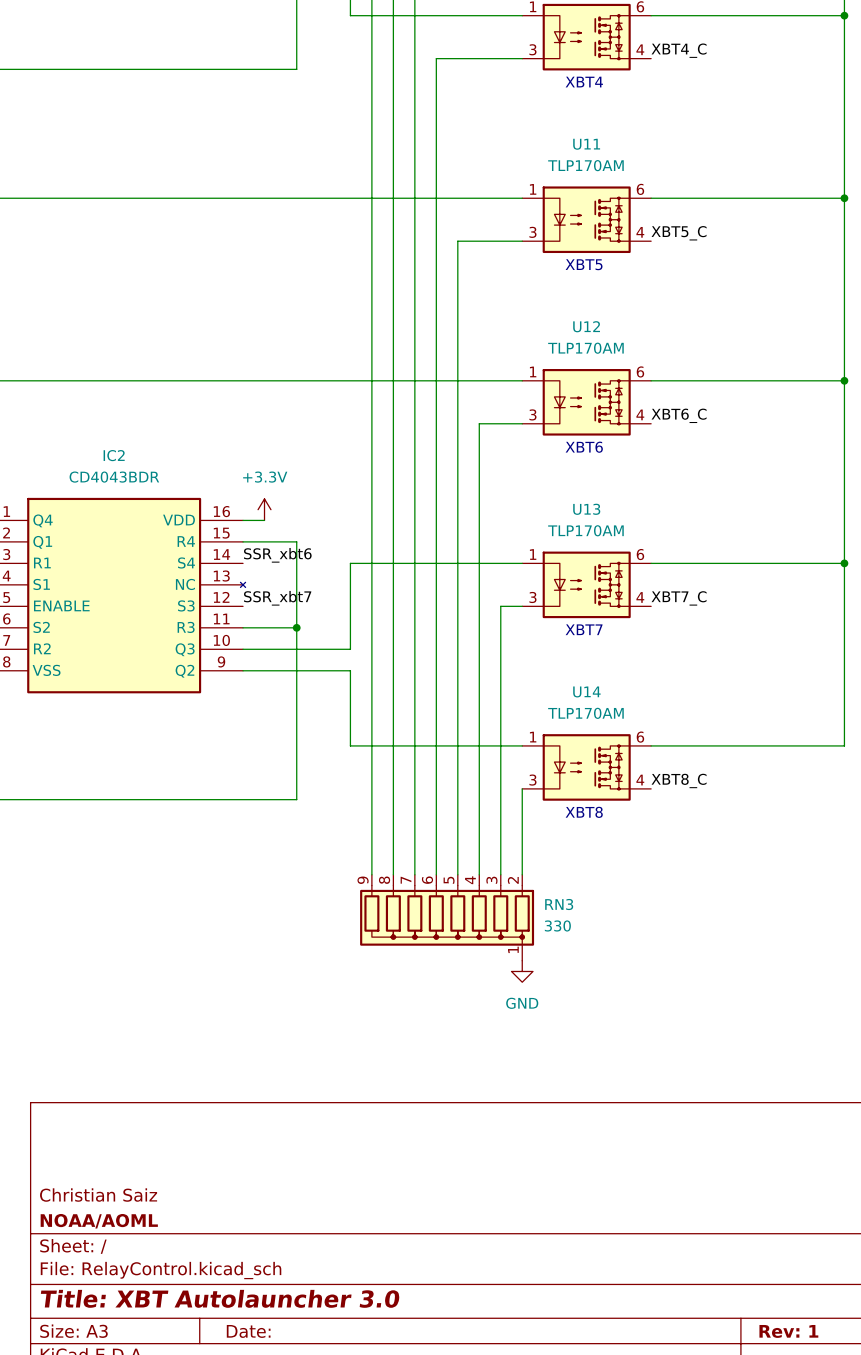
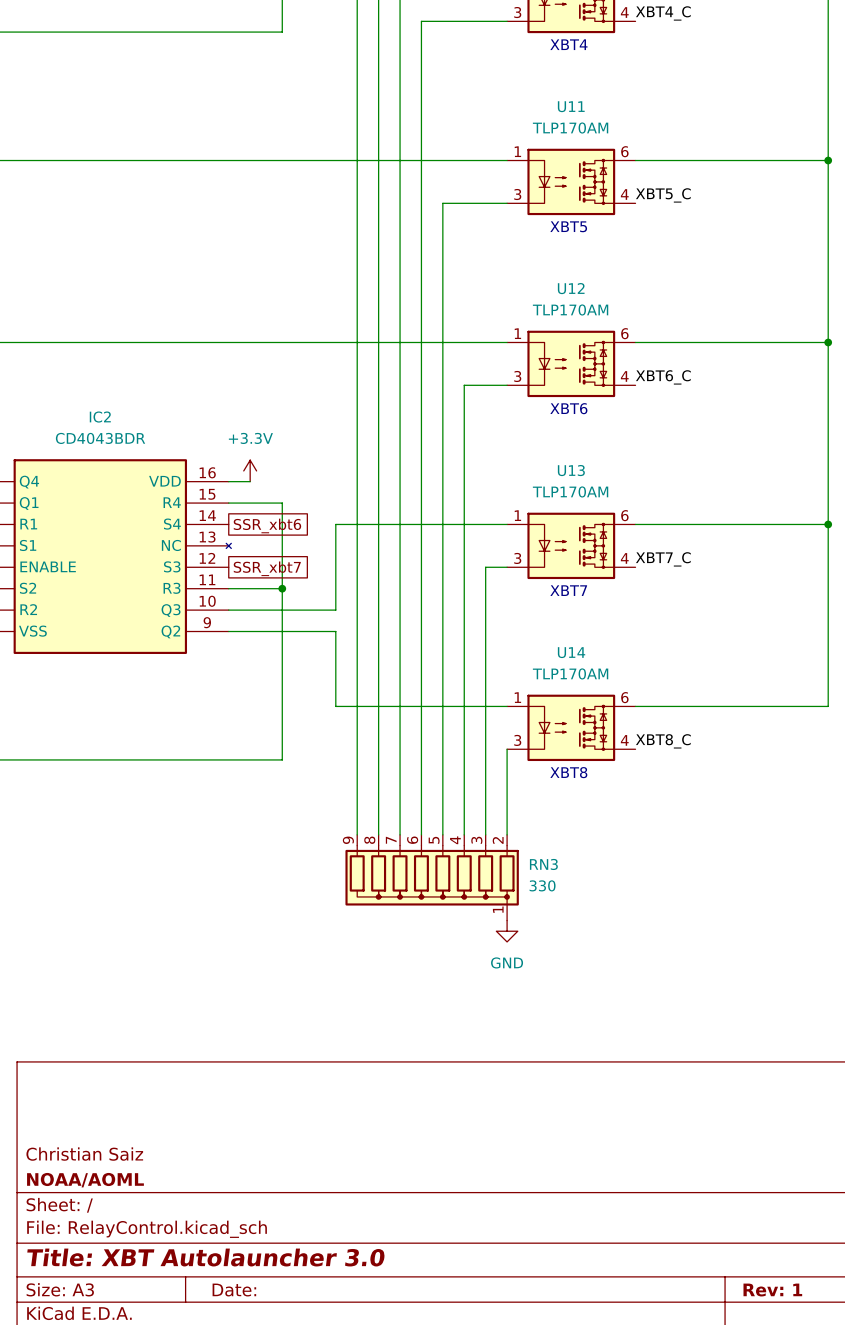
label: SSR_xbt6 (277, 555) -> none
global label: none -> SSR_xbt6 (267, 525)
label: SSR_xbt7 (277, 598) -> none
global label: none -> SSR_xbt7 (267, 568)

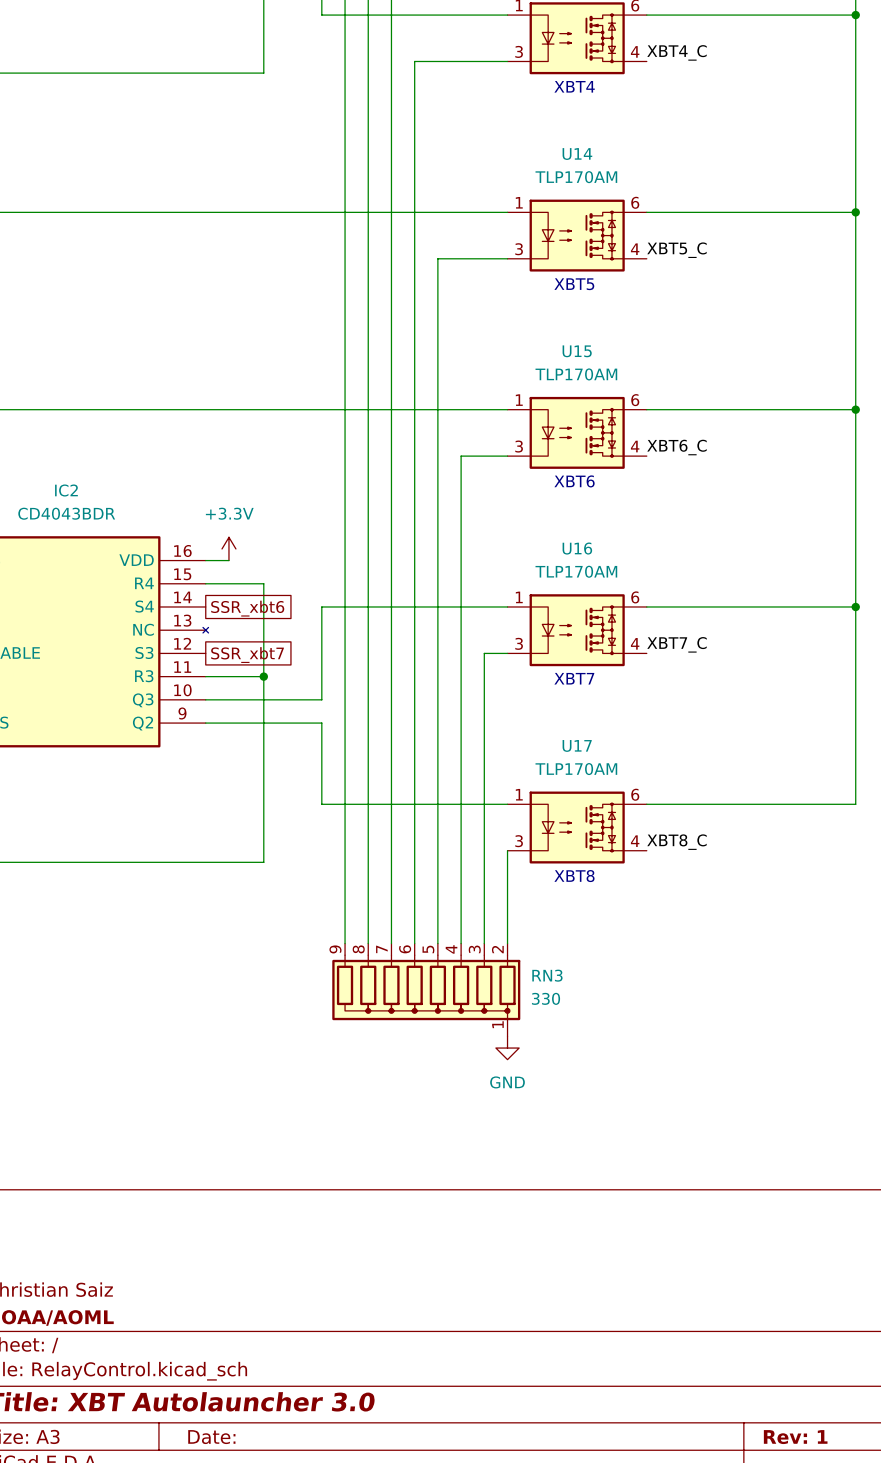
U11 name: U11 (571, 106) -> U14 (577, 154)
U12 name: U12 (571, 288) -> U15 (577, 351)
U13 name: U13 (571, 470) -> U16 (577, 548)
U14 name: U14 (571, 652) -> U17 (577, 745)

